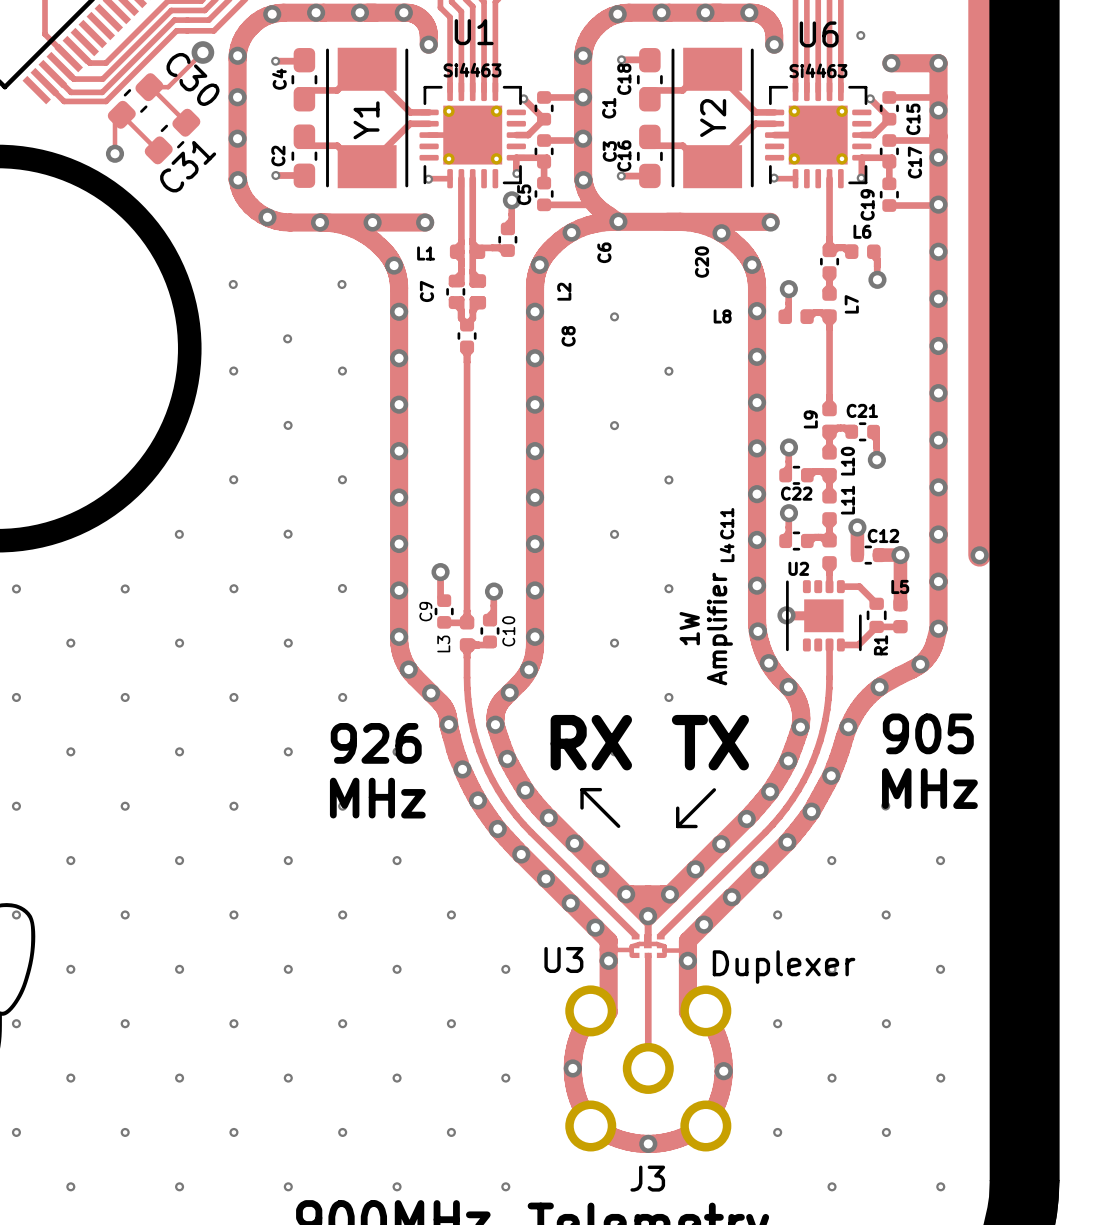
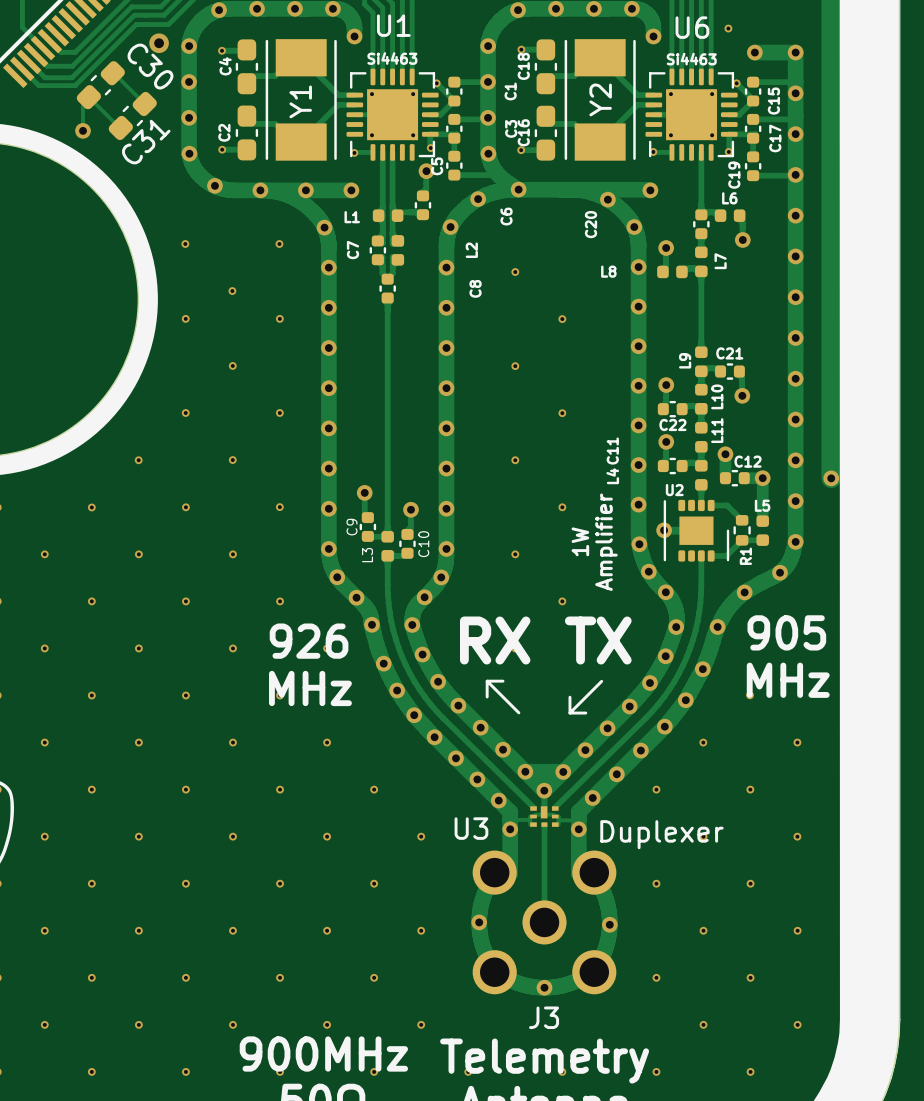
track: (202, 52) (168, 87) (149, 87) -> none

